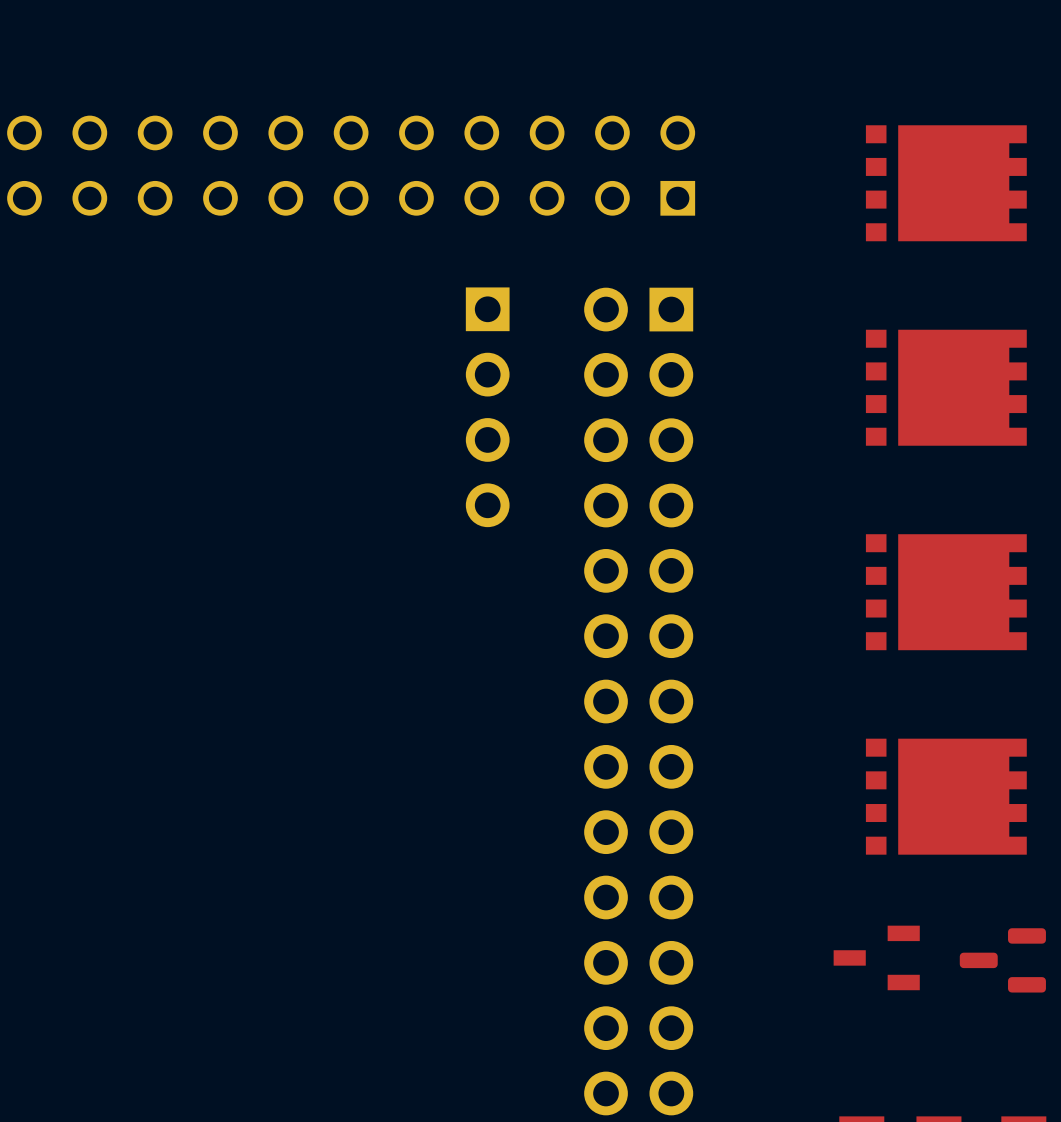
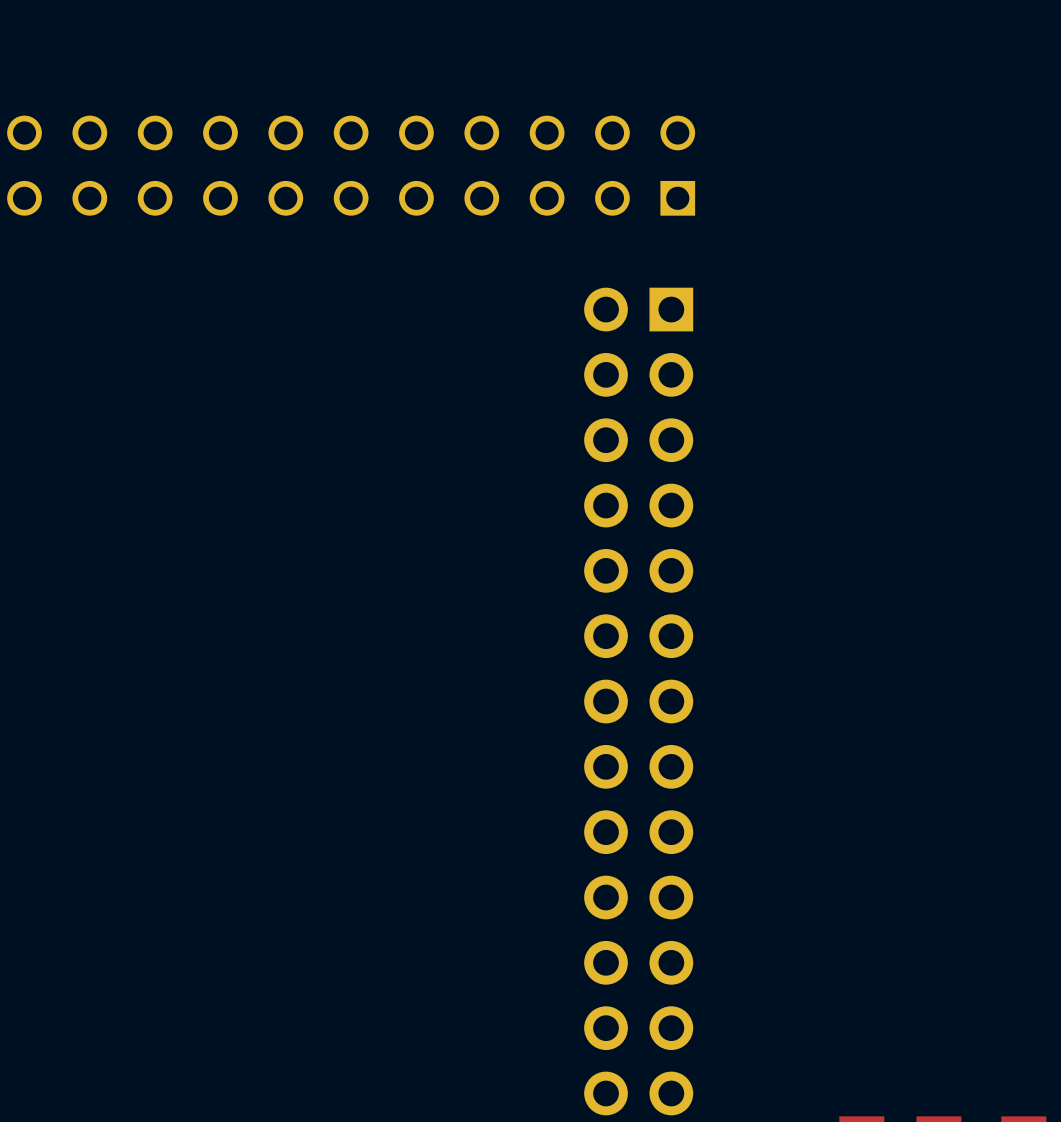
part: (946, 183) -> none
part: (946, 387) -> none
part: (487, 407) -> none
part: (946, 592) -> none
part: (946, 796) -> none
part: (876, 957) -> none
part: (1002, 960) -> none

